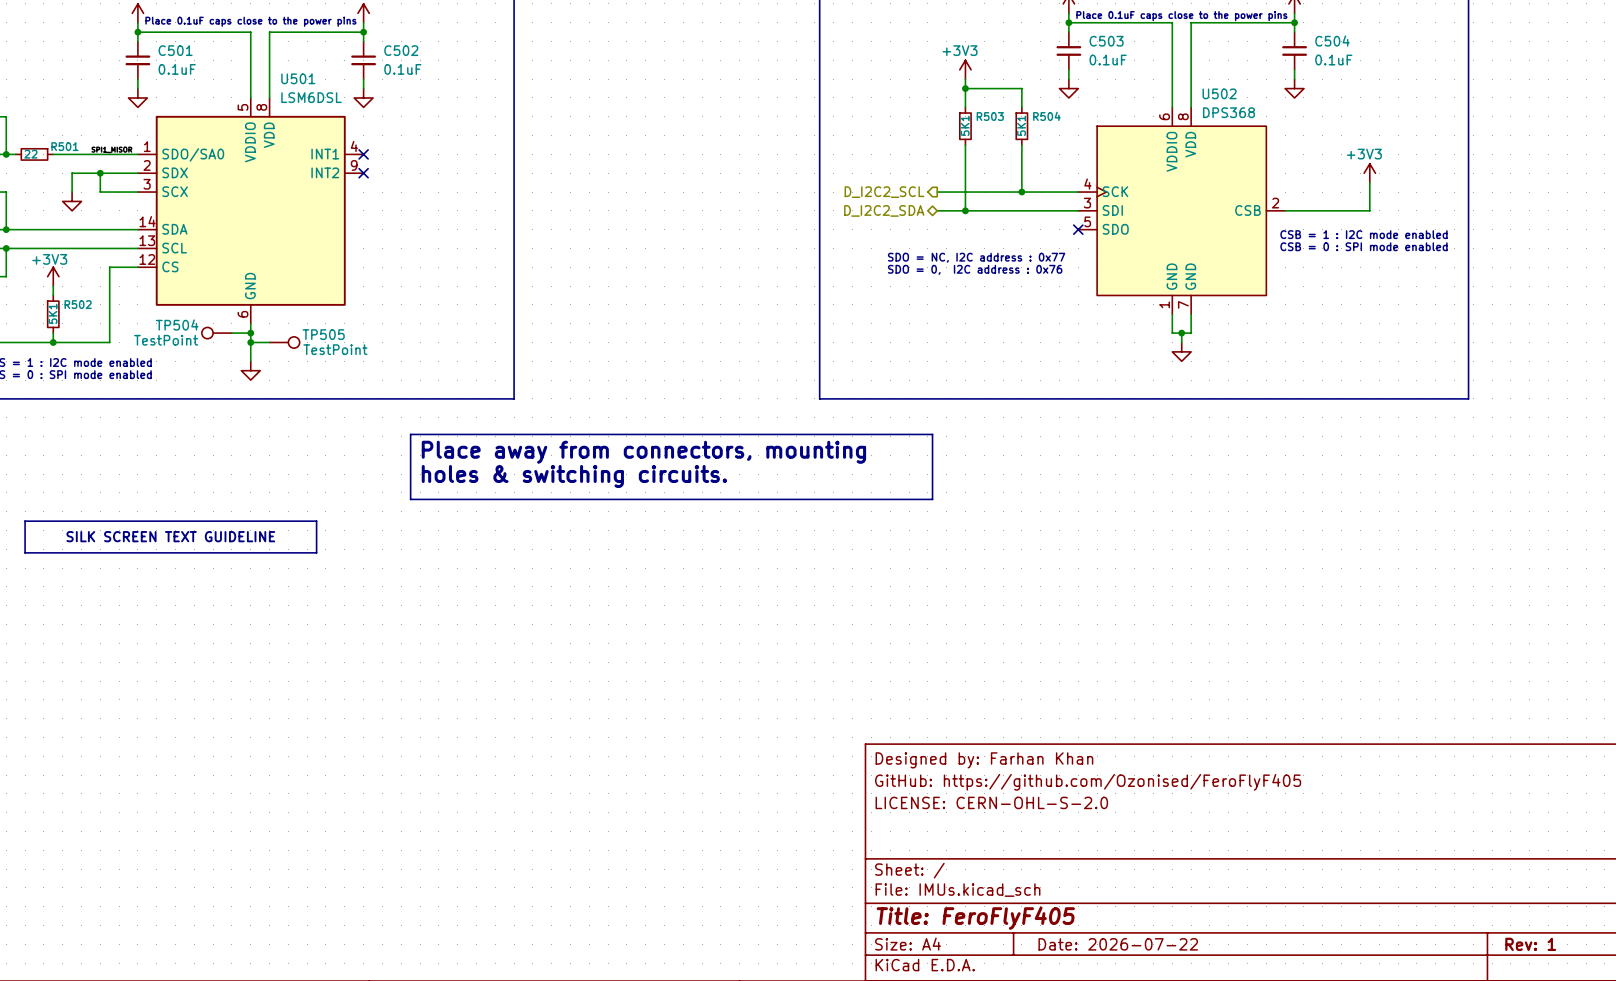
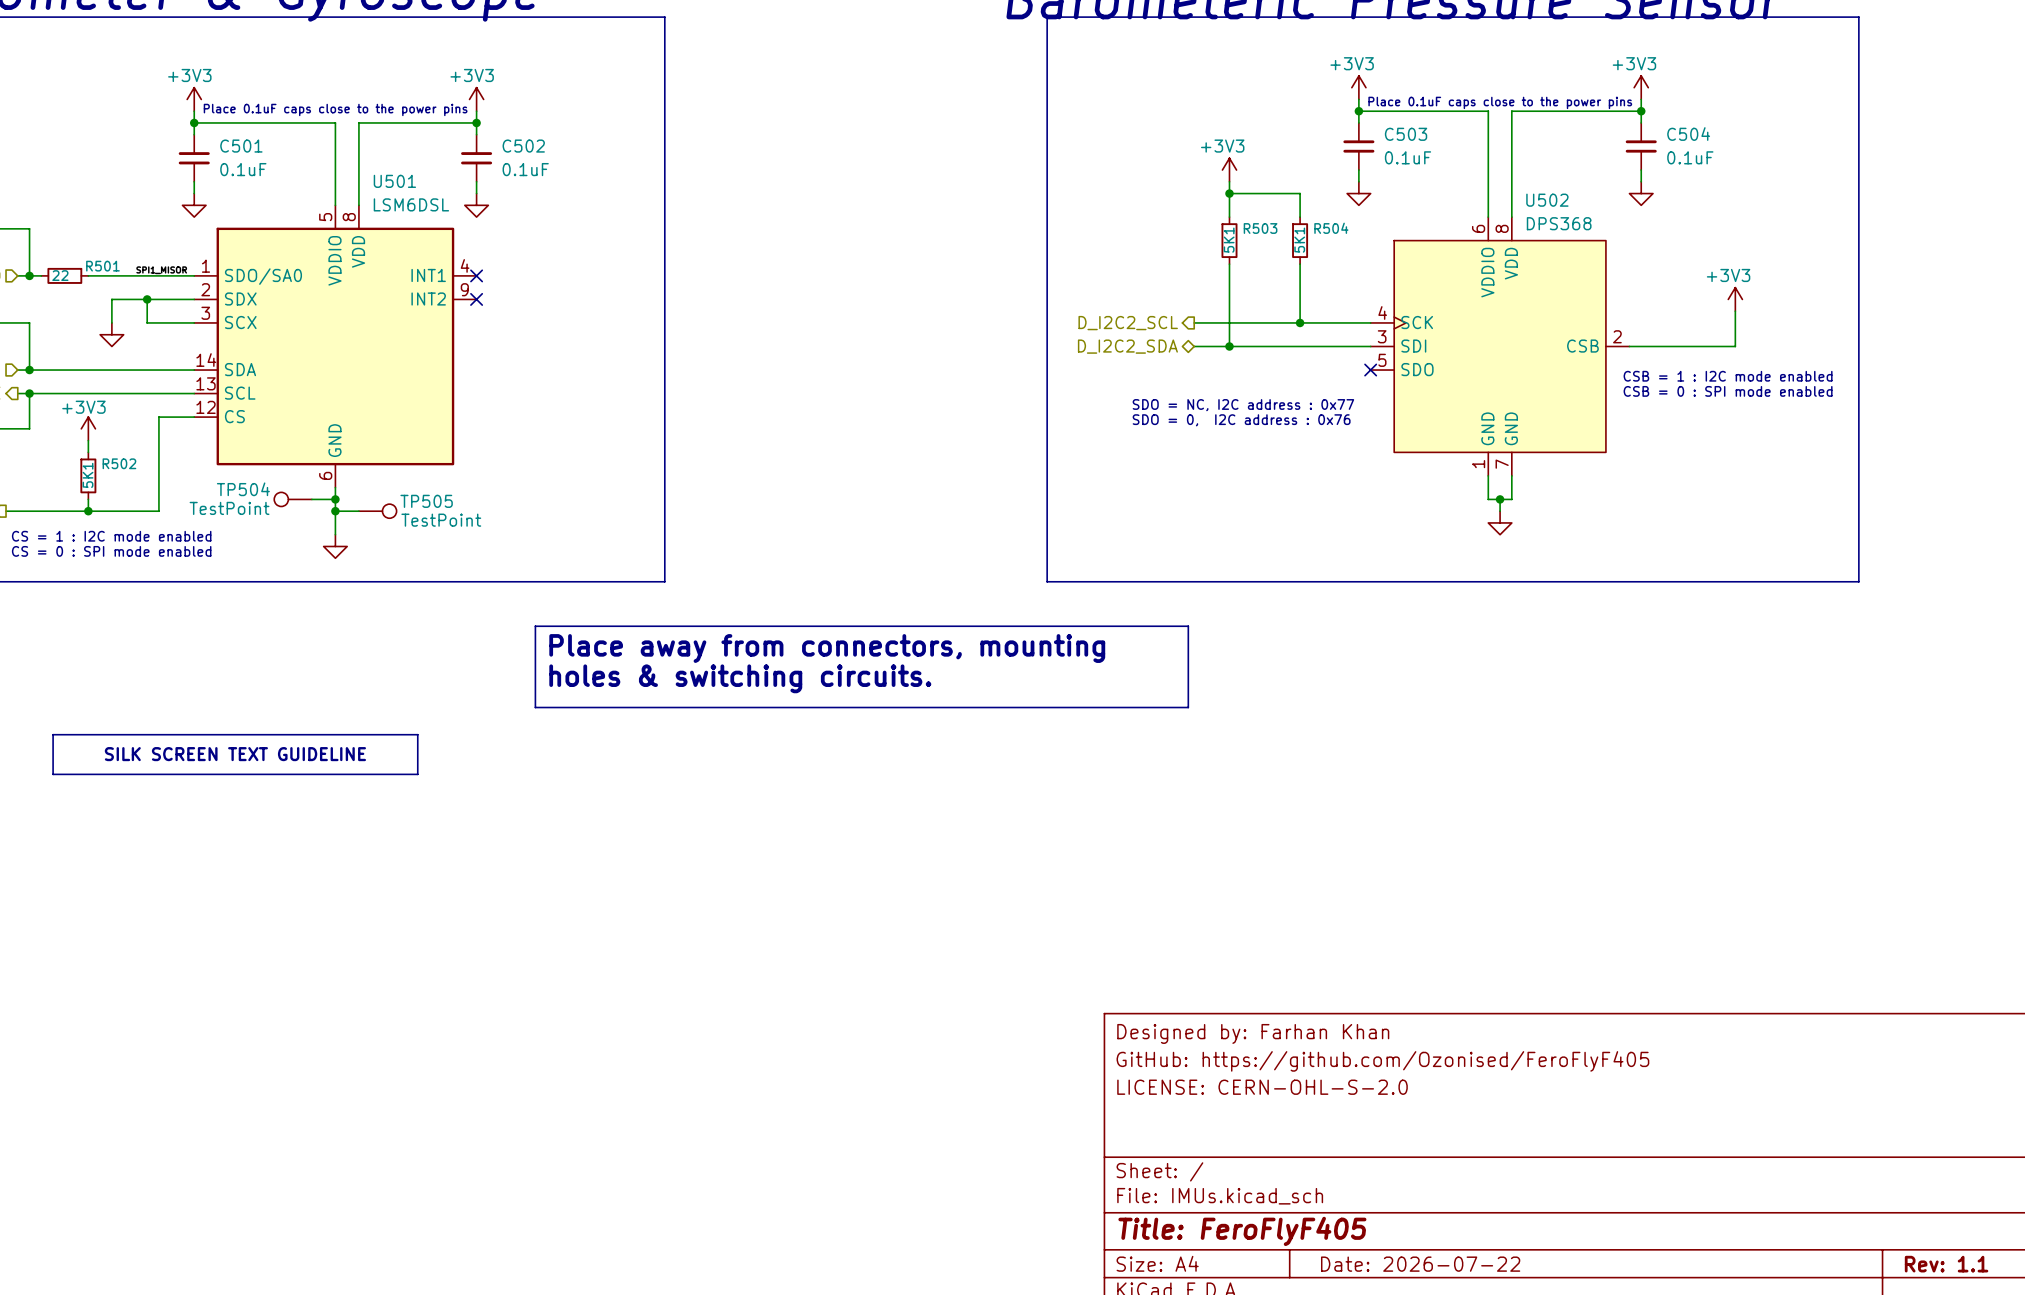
title block: Rev: 1 (1530, 944) -> Rev: 1.1 (1946, 1264)

